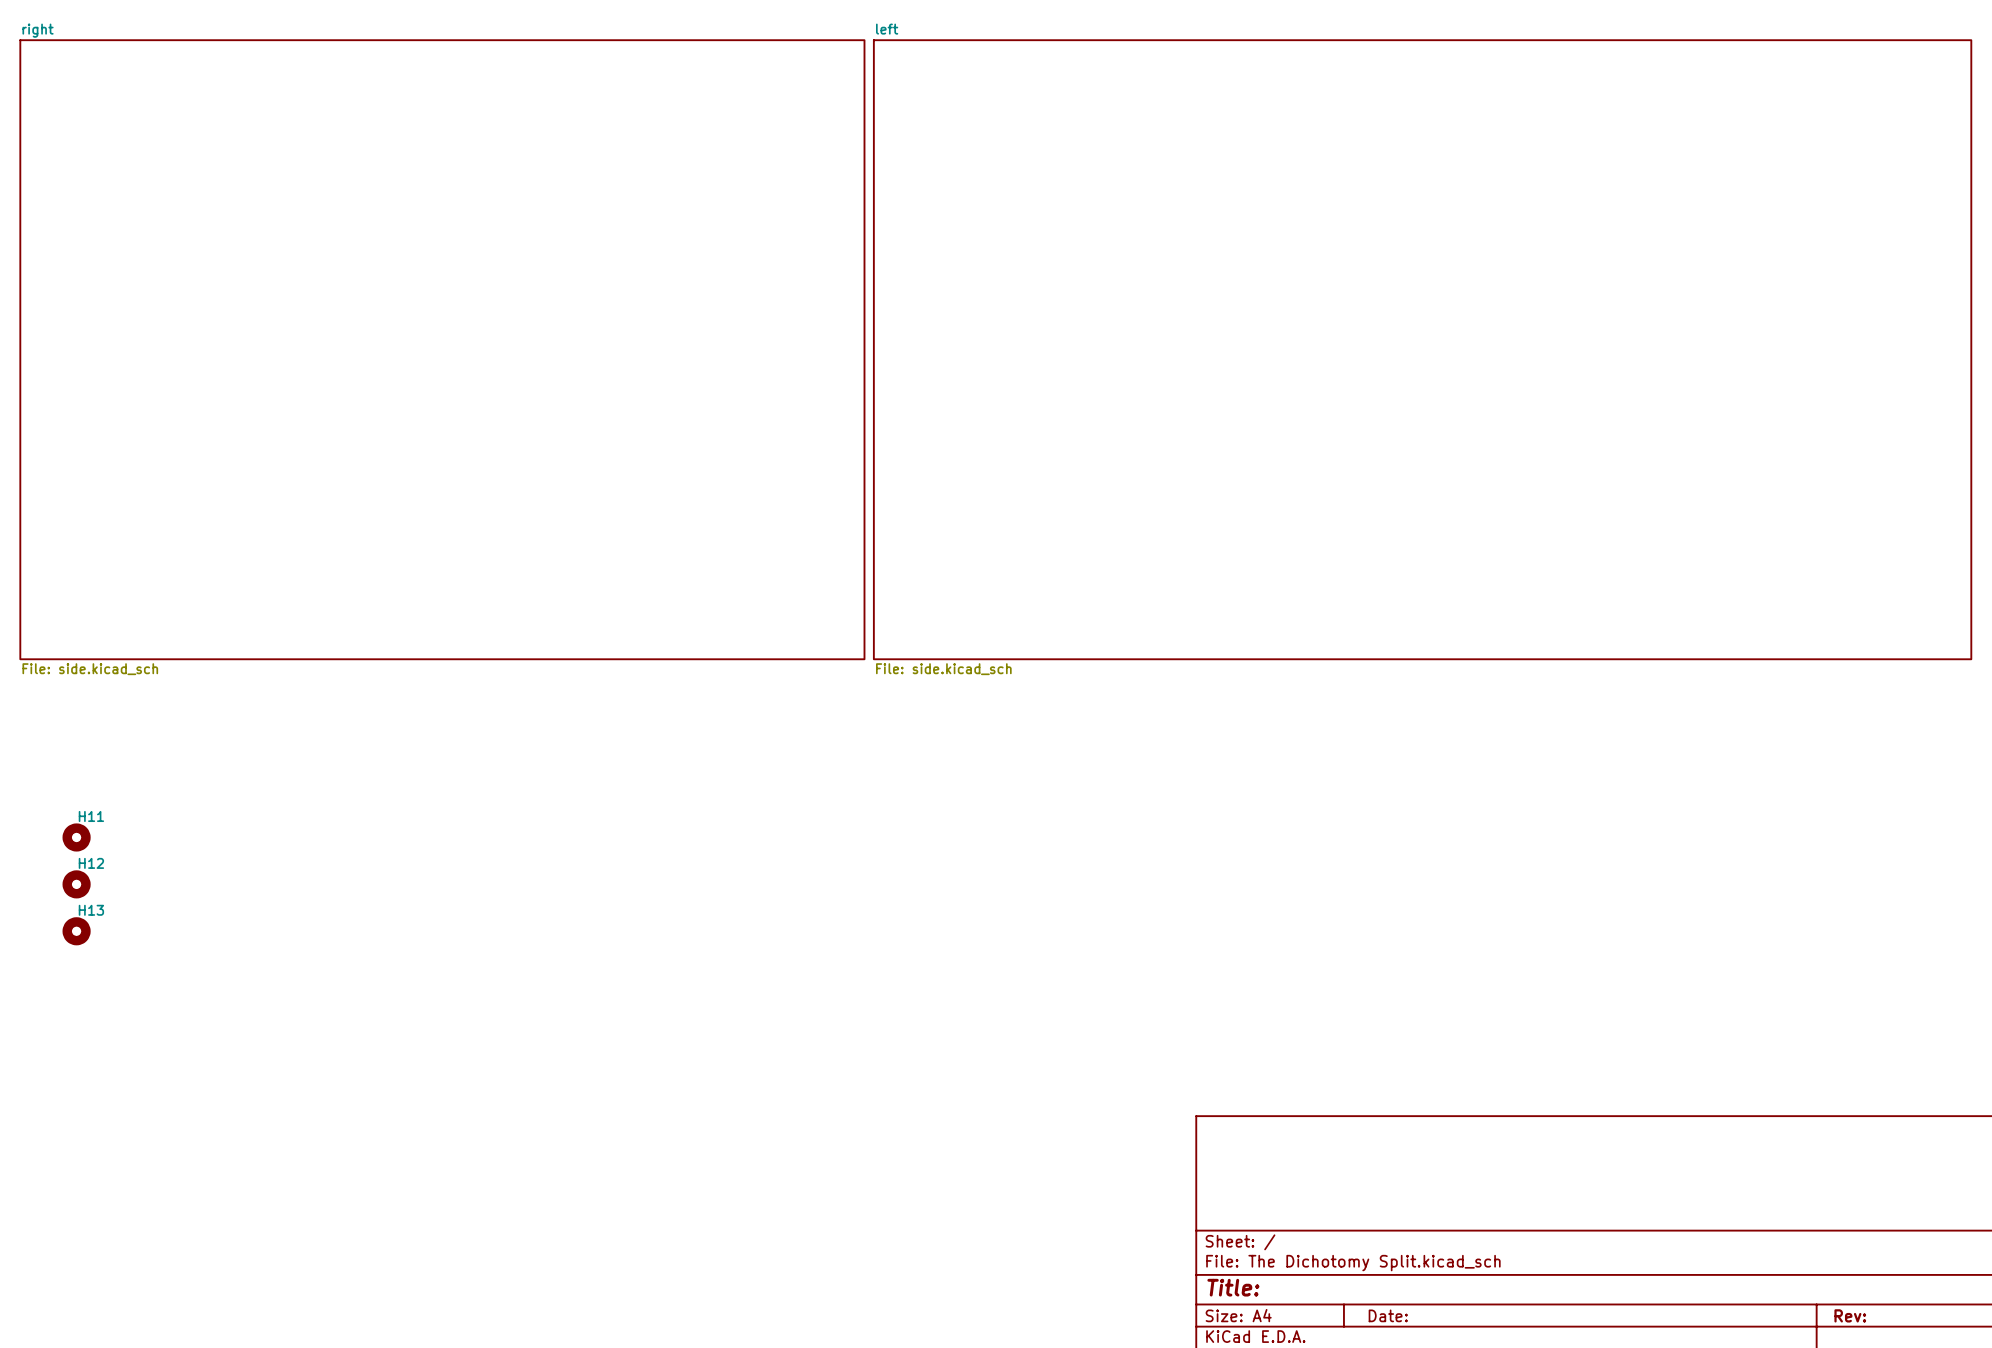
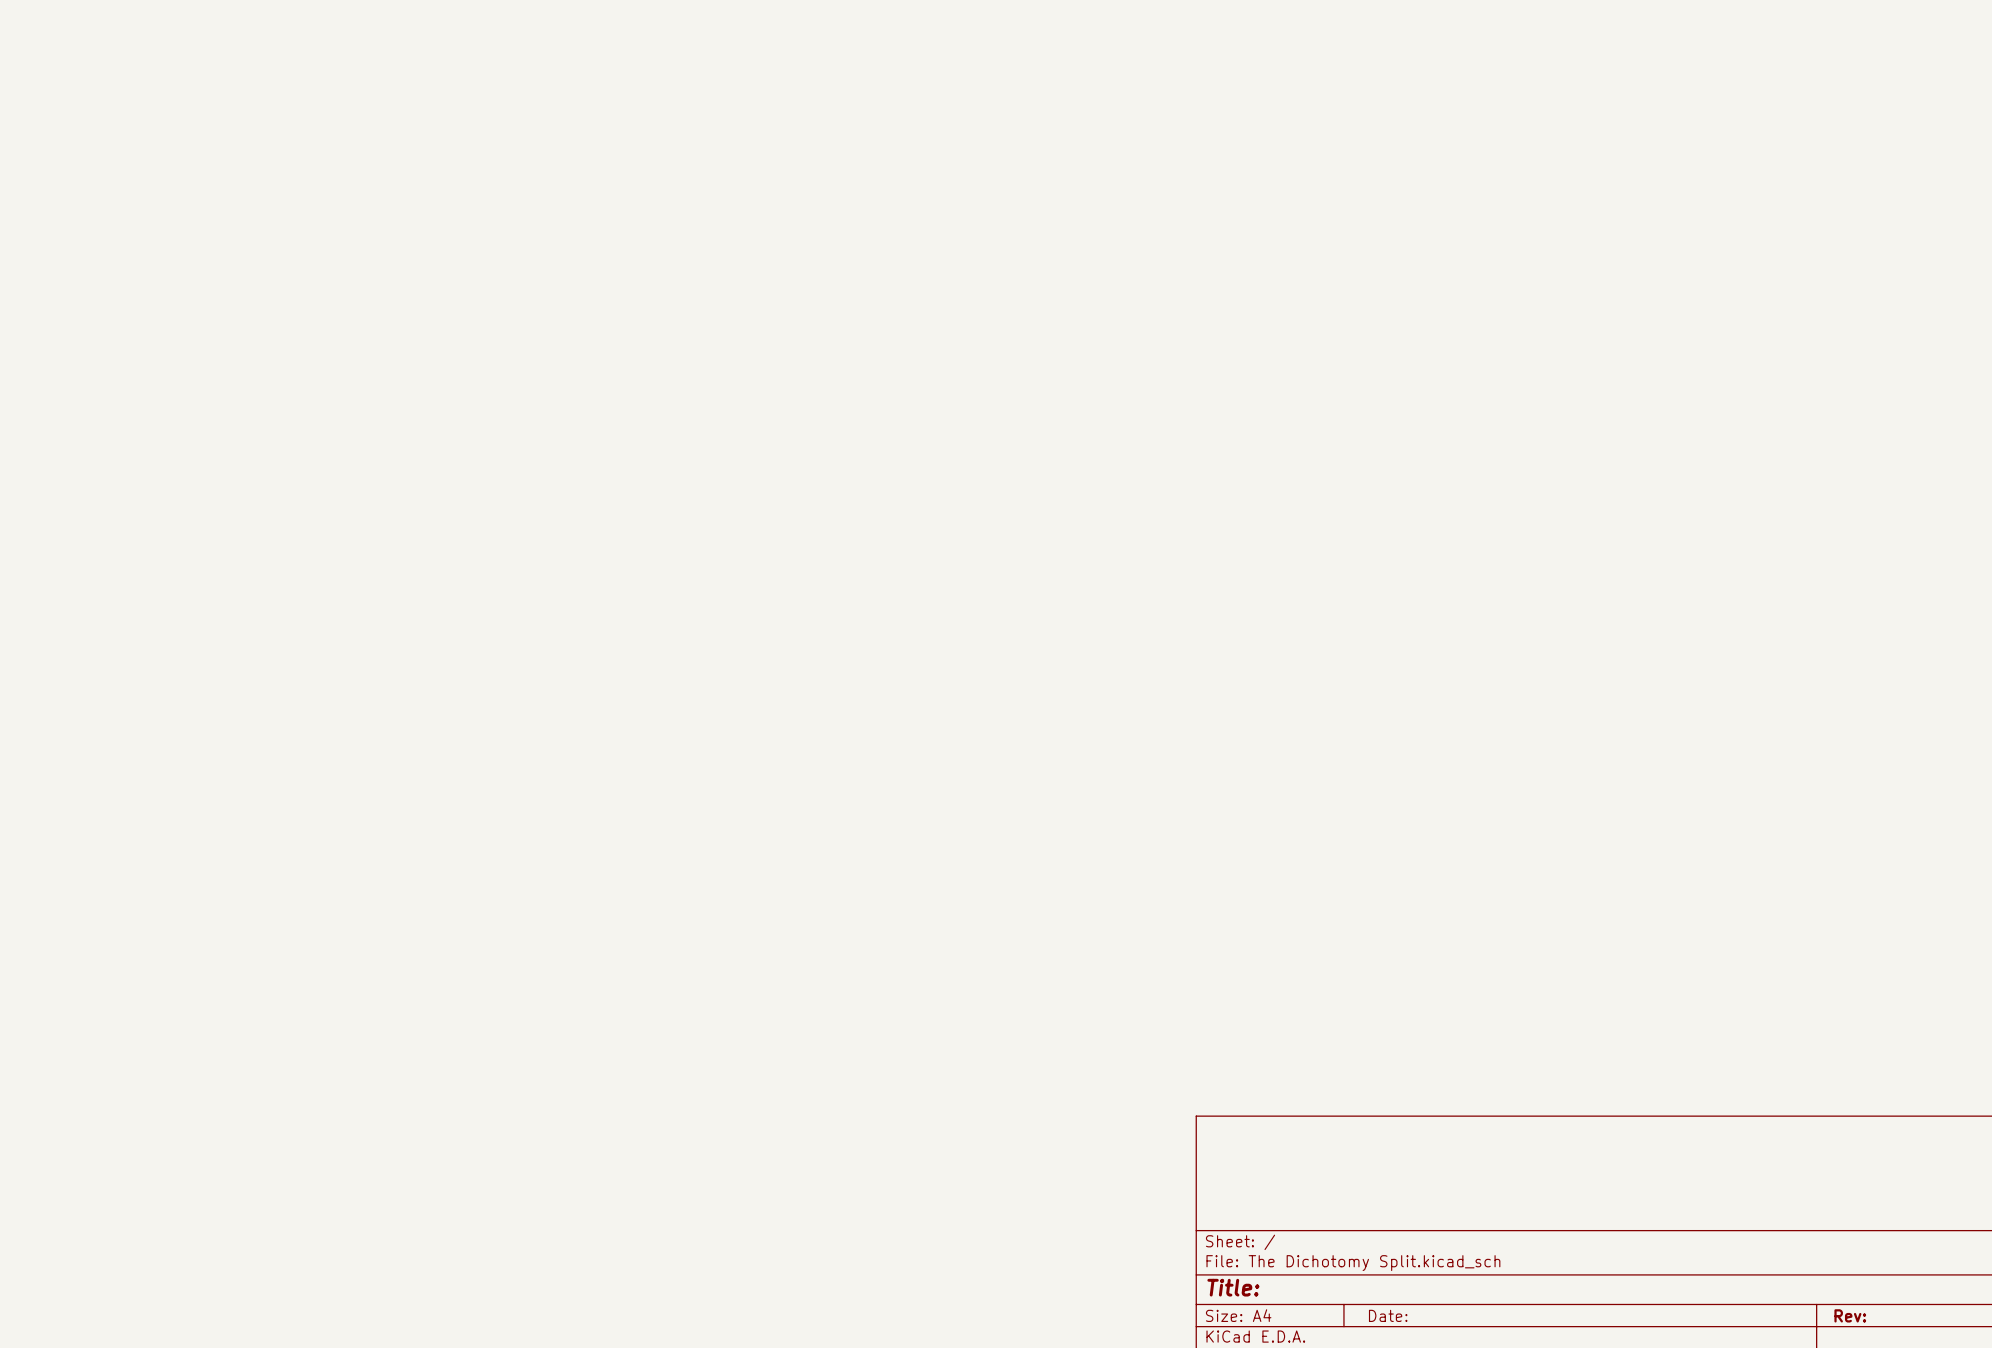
sheet right: File: side.kicad_sch (442, 349) -> none
sheet left: File: side.kicad_sch (1422, 349) -> none
H11: (76, 837) -> none
H12: (76, 884) -> none
H13: (76, 931) -> none

